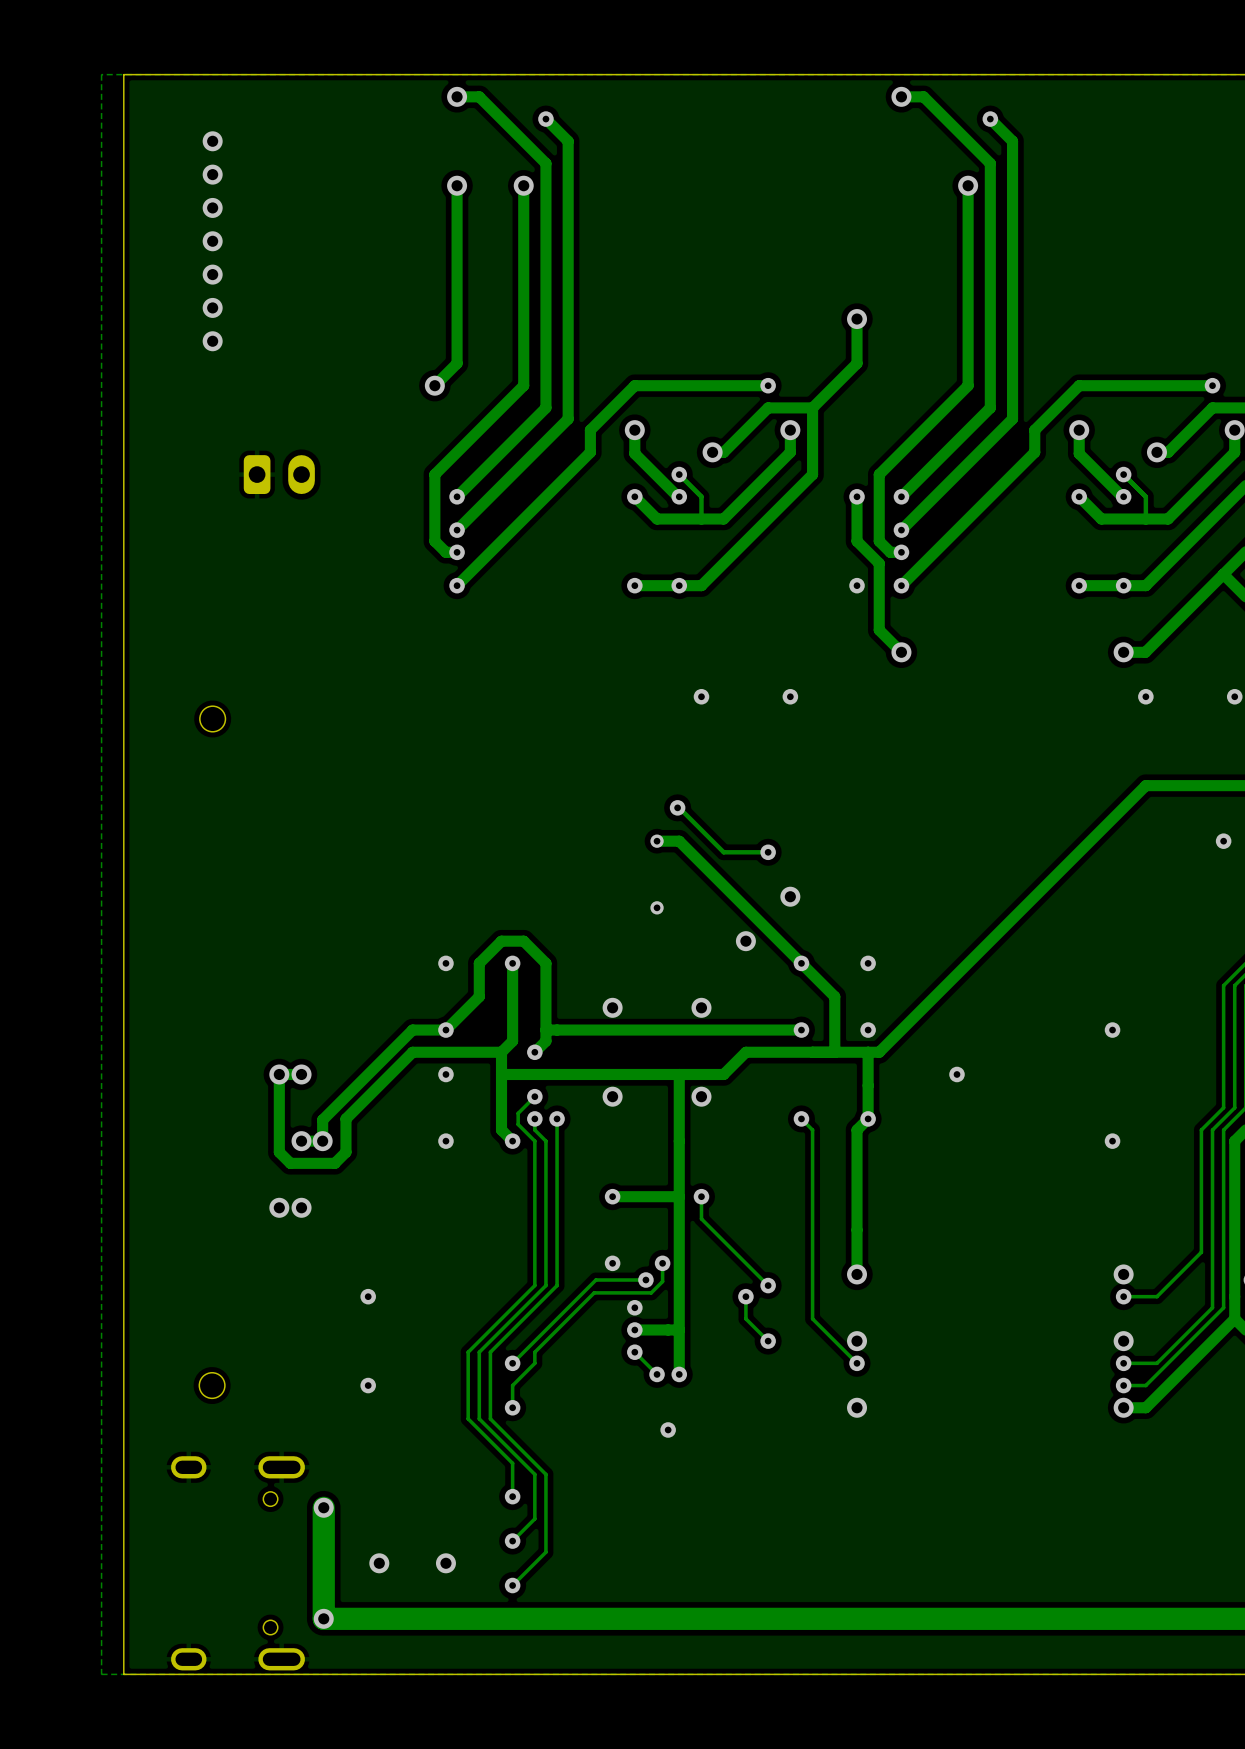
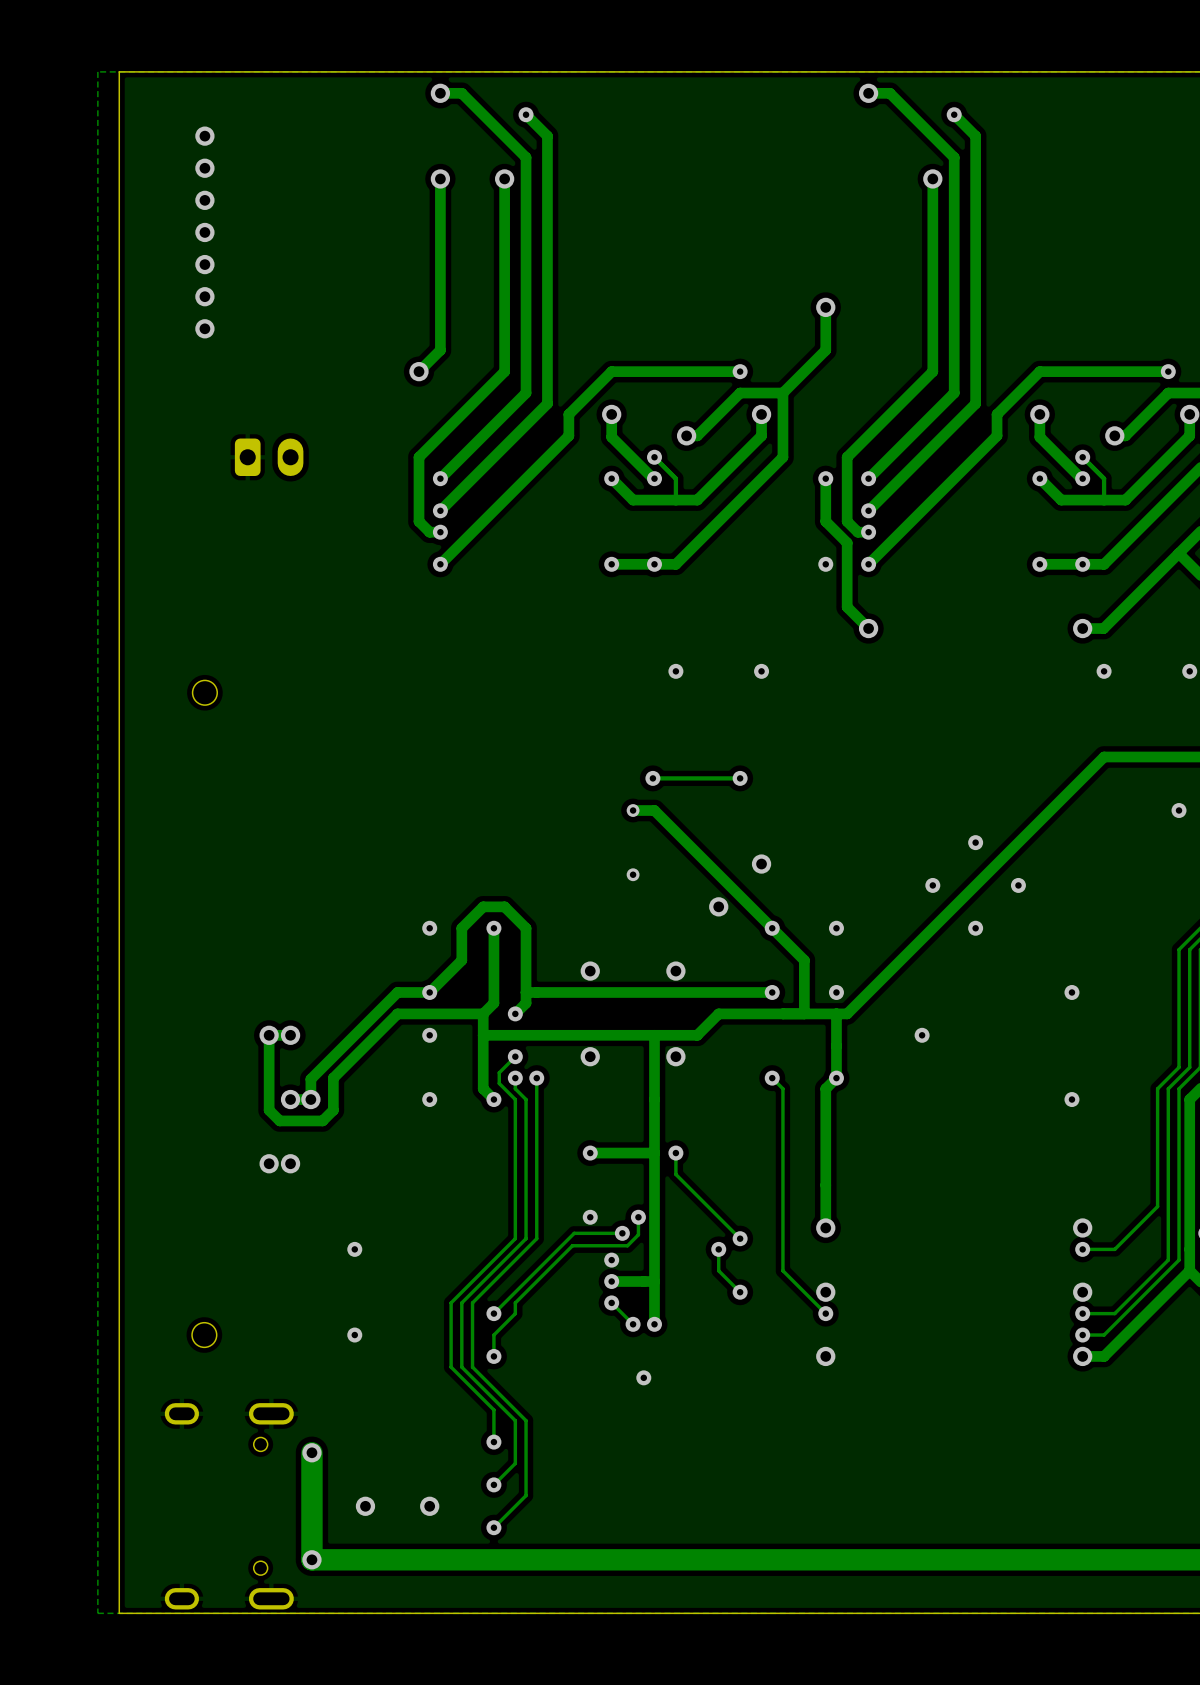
track: (679, 807) (723, 852) (768, 852) -> (654, 778) (740, 778)
via position: (768, 852) -> (740, 778)
via: none -> (975, 842)
via: none -> (932, 885)
via: none -> (1018, 885)
via: none -> (975, 928)

